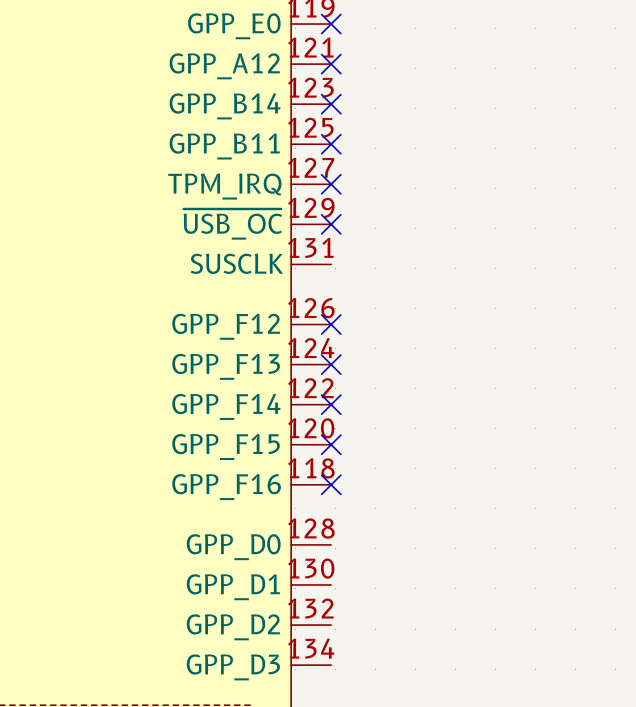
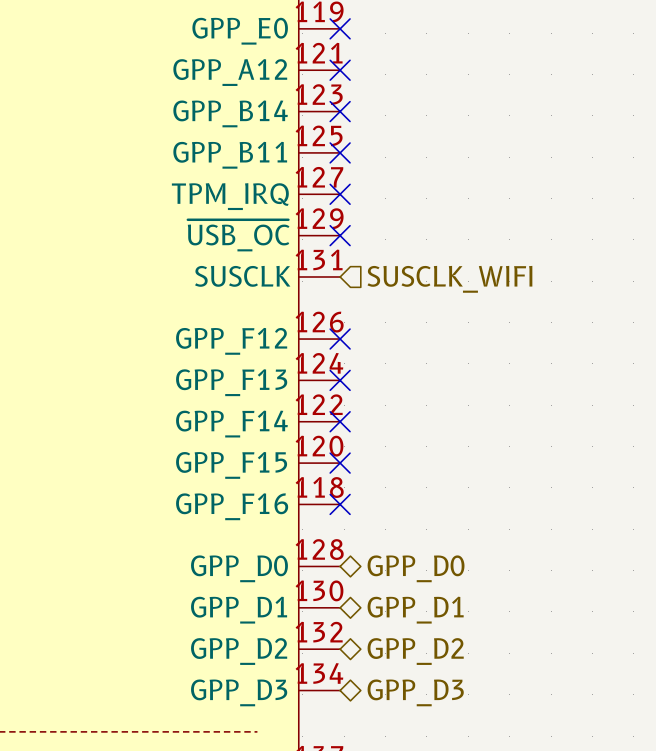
hierarchical label: none -> SUSCLK_WIFI (449, 279)
hierarchical label: none -> GPP_D0 (416, 568)
hierarchical label: none -> GPP_D1 (415, 610)
hierarchical label: none -> GPP_D2 (415, 651)
hierarchical label: none -> GPP_D3 (415, 692)

